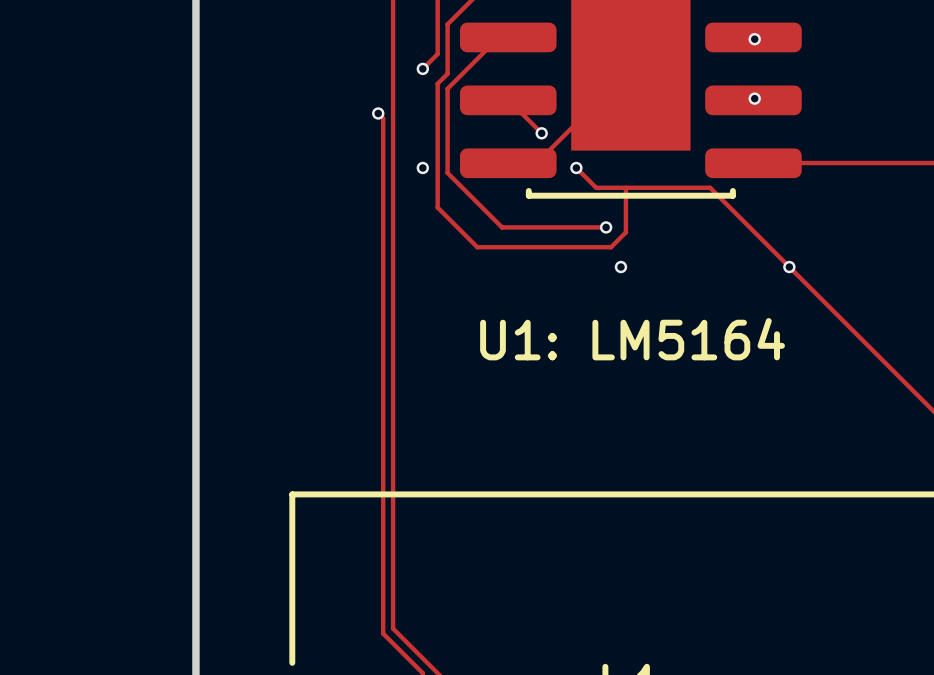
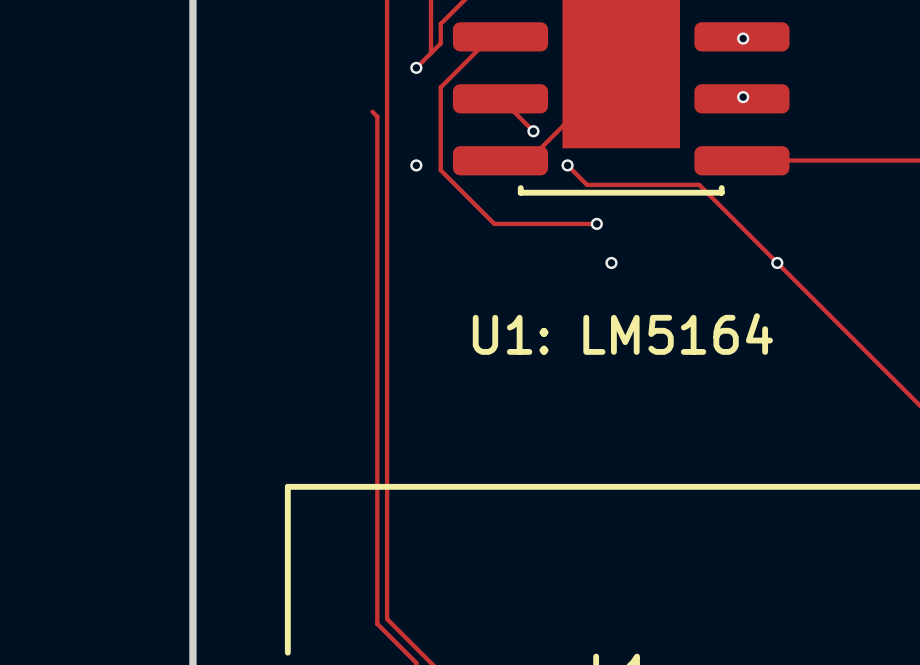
track: (447, 44) (447, 73) (437, 83) (437, 207) (477, 247) (611, 247) (625, 232) (625, 187) -> (440, 43) (430, 53)
via: (378, 113) -> none

